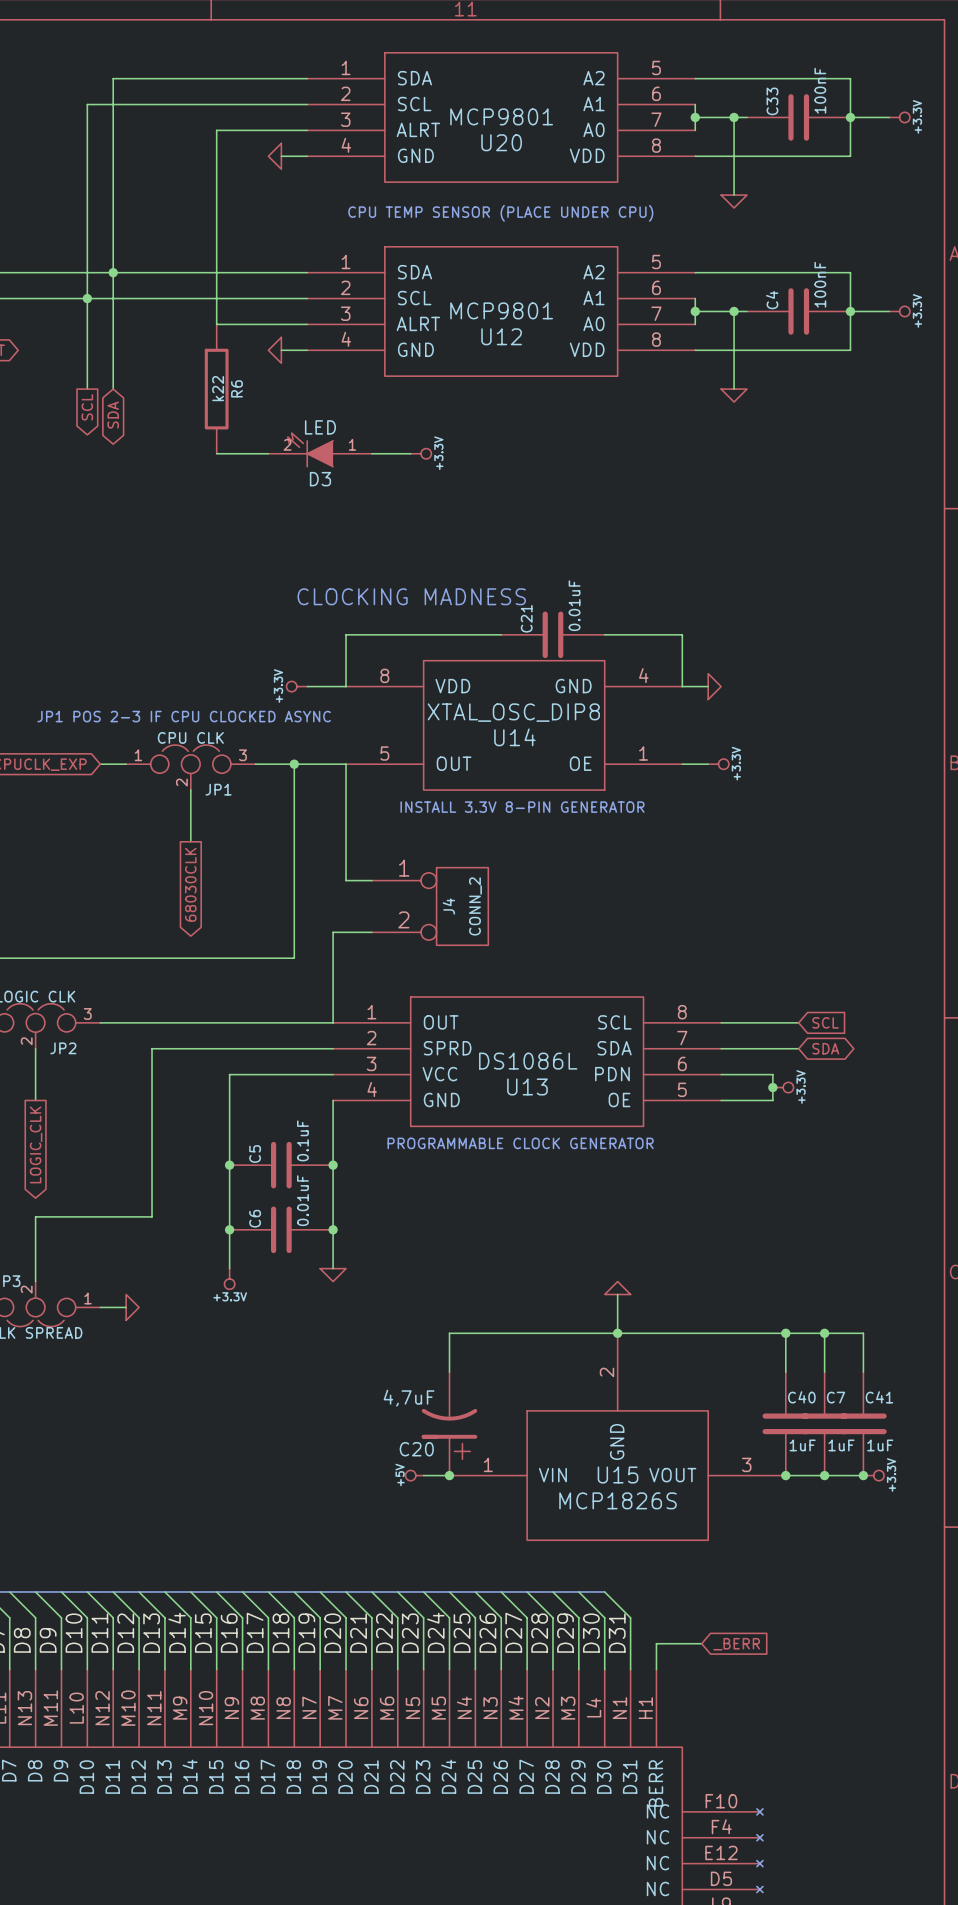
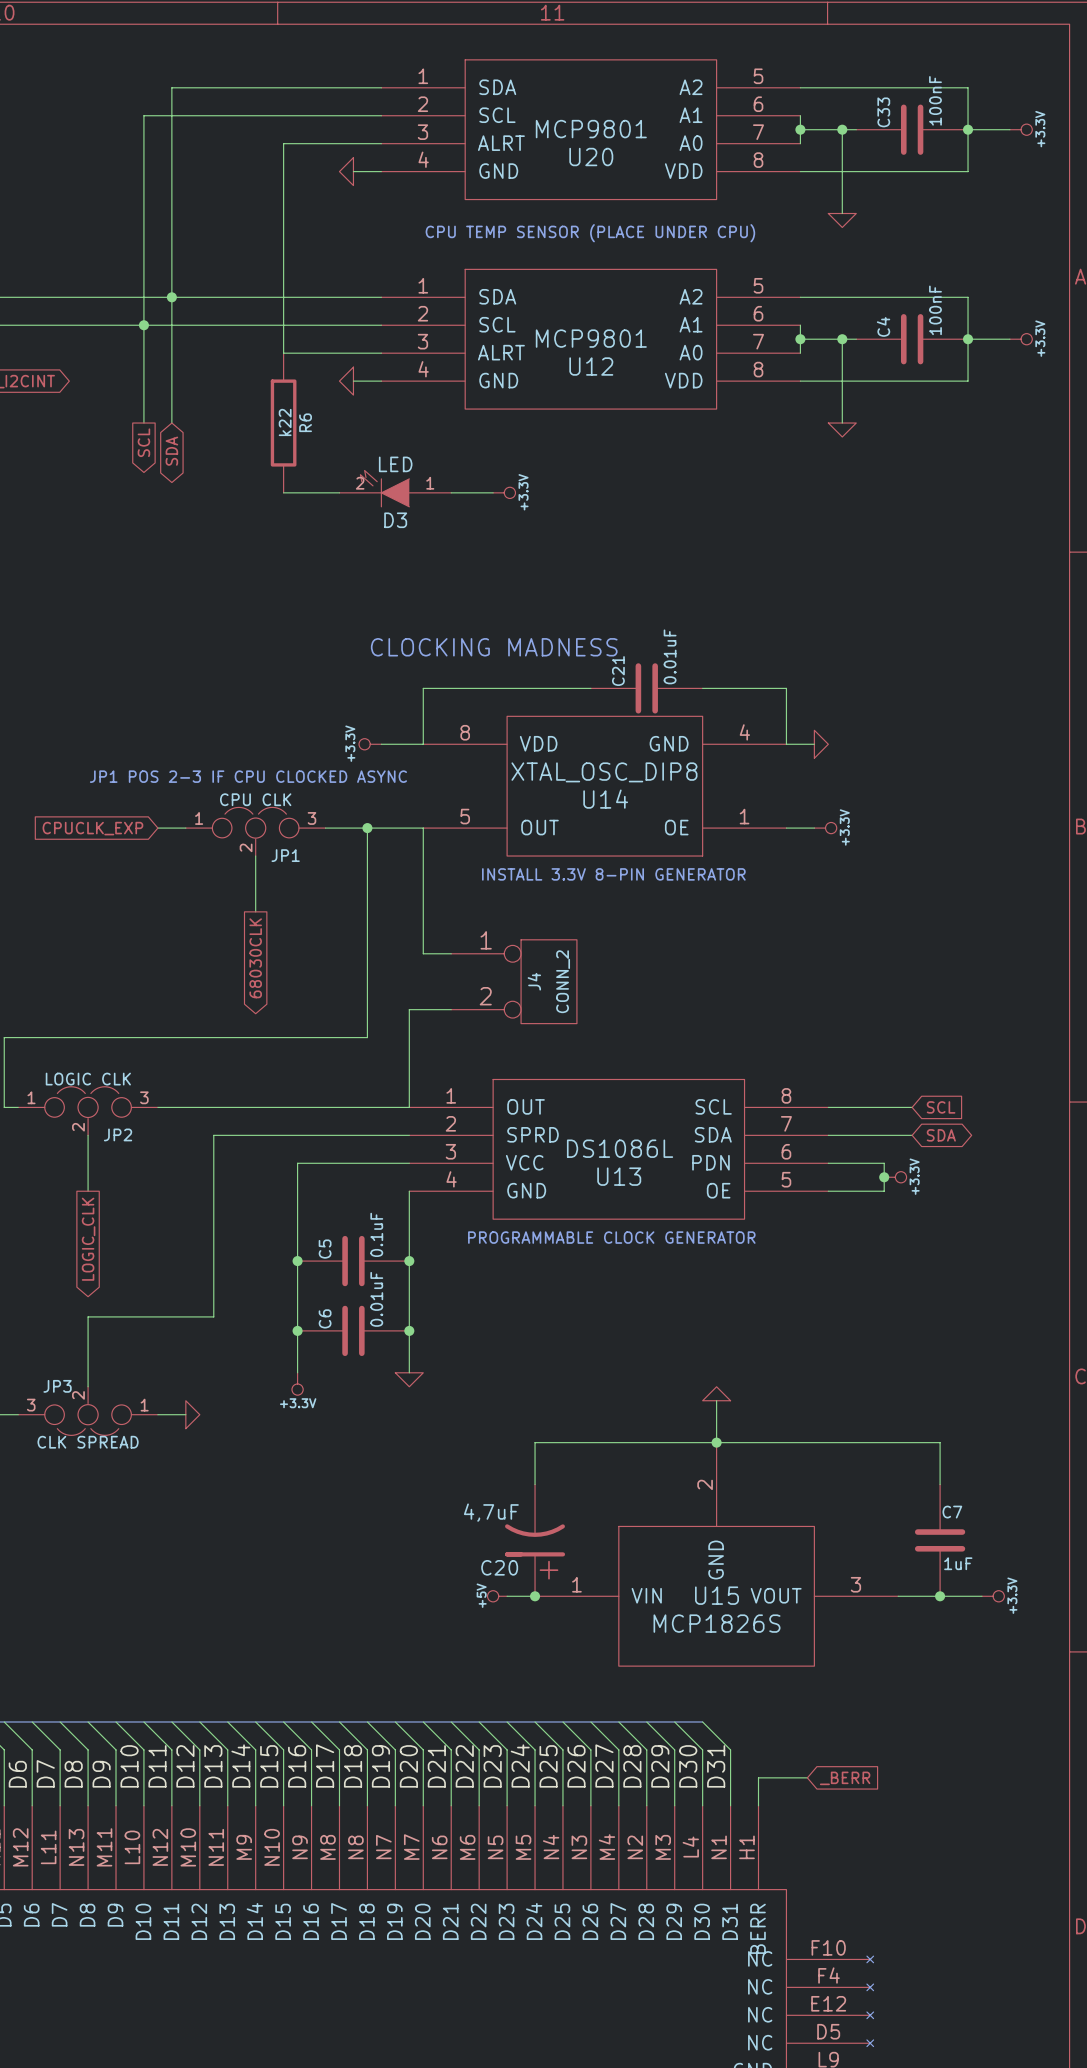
wire: (785, 1333) (785, 1372) -> none
junction: (785, 1333) -> none
wire: (824, 1333) (863, 1333) (863, 1372) -> none
junction: (824, 1333) -> none
C40: 1uF (785, 1423) -> none
C41: 1uF (863, 1423) -> none
junction: (785, 1475) -> none
junction: (863, 1475) -> none

